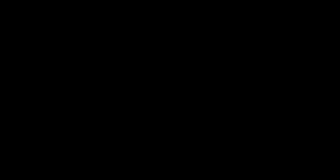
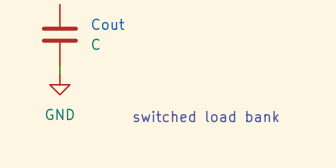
Cout: none -> C (59, 34)
wire: none -> (59, 64) (59, 74)
power symbol: none -> GND (59, 84)
text: none -> switched load bank (206, 116)

